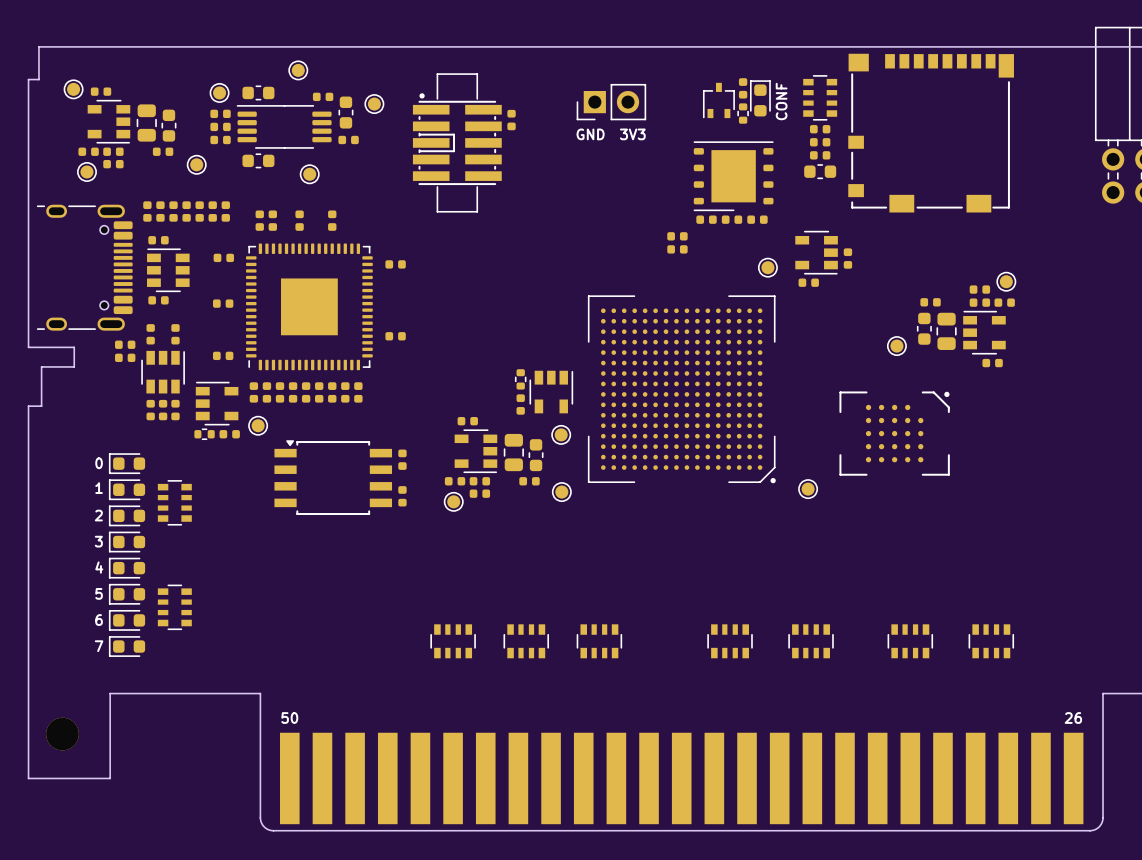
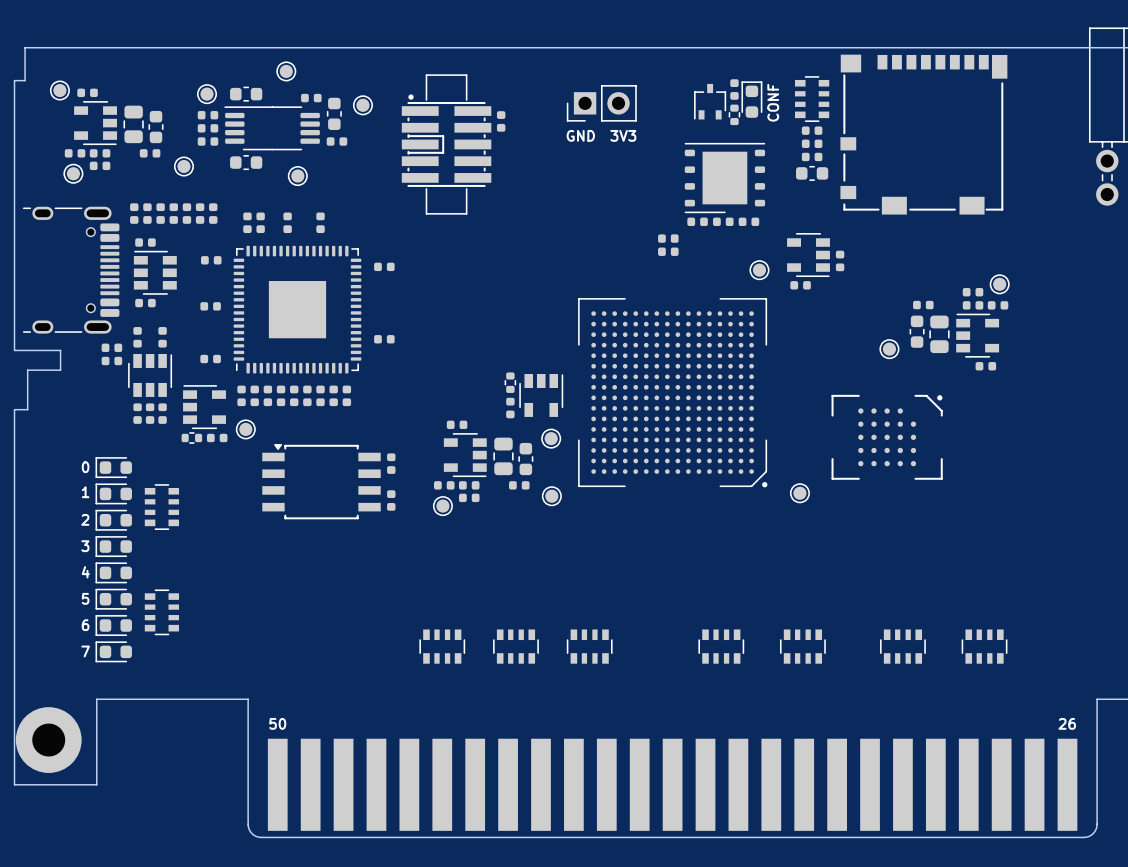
part footprint: [46, 717, 79, 751] -> [15, 707, 82, 773]

